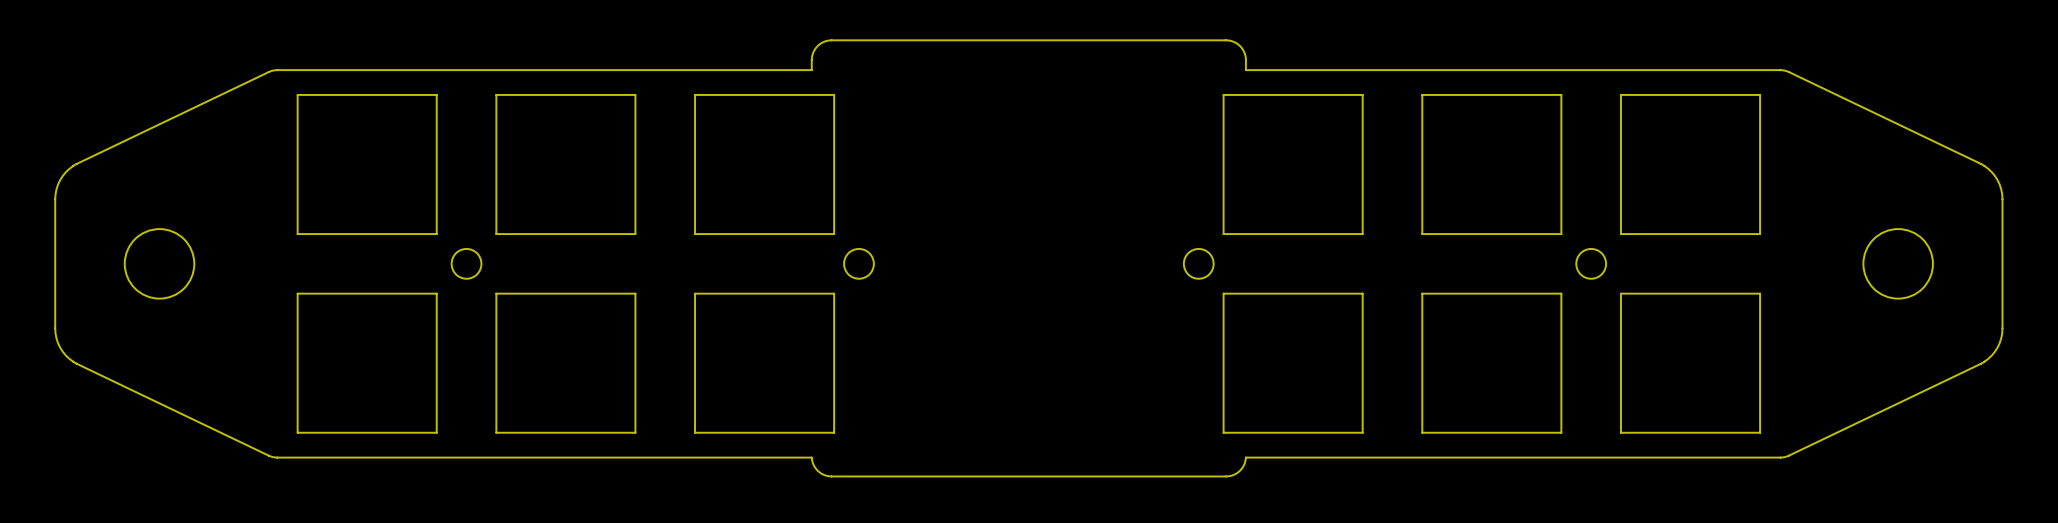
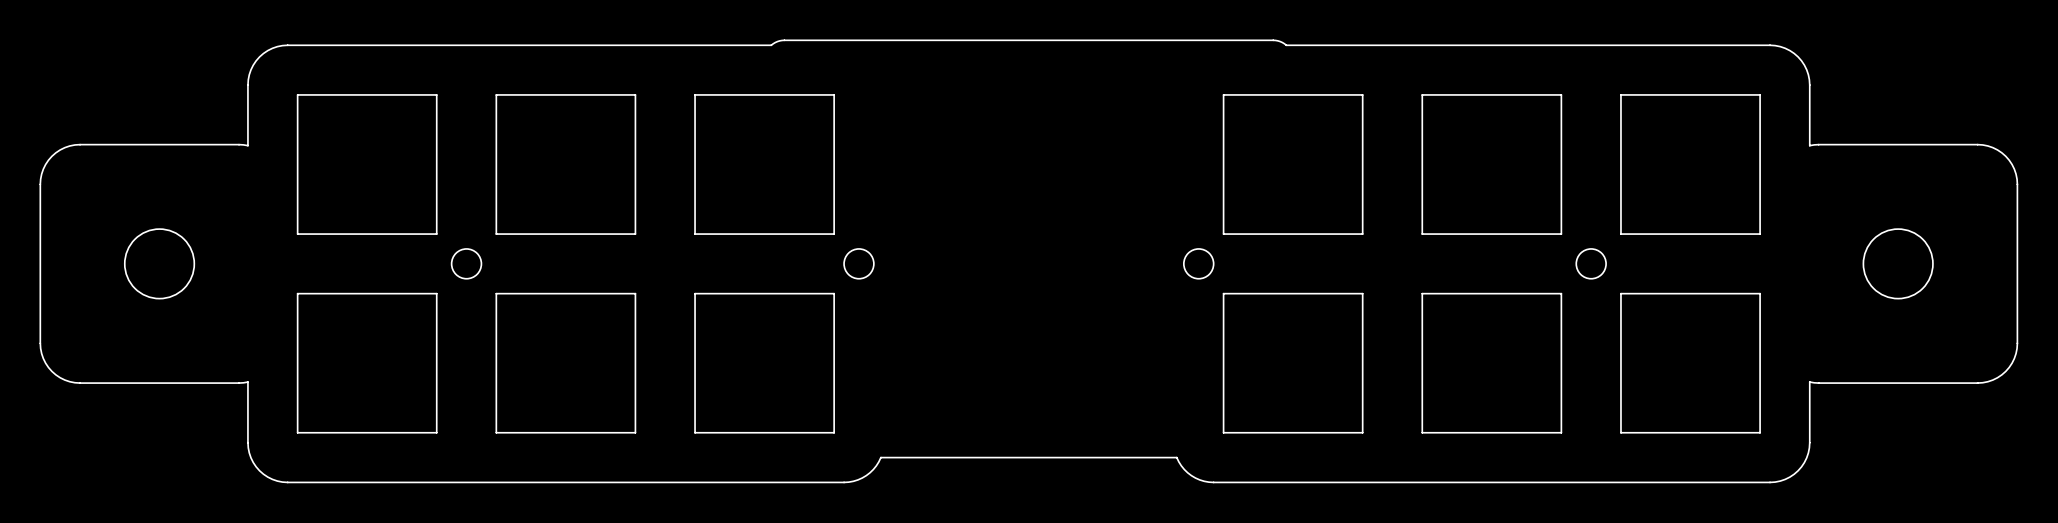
board edge: (831, 40) (821, 43) (814, 49) (811, 57) (811, 70) (270, 71) (76, 164) (62, 176) (56, 189) (55, 199) (55, 328) (57, 342) (65, 355) (76, 363) (275, 457) (811, 457) (817, 470) (831, 476) (1226, 476) (1239, 470) (1245, 457) (1784, 457) (1981, 363) (1992, 355) (1999, 342) (2002, 328) (2002, 199) (1999, 184) (1995, 176) (1981, 164) (1786, 71) (1245, 70) (1245, 57) (1242, 49) (1236, 43) (1226, 40) -> (831, 40) (782, 40) (771, 45) (287, 45) (272, 48) (259, 56) (249, 74) (247, 145) (74, 144) (60, 149) (48, 160) (41, 174) (40, 184) (40, 343) (43, 358) (55, 374) (74, 382) (247, 382) (247, 442) (250, 457) (263, 474) (282, 482) (844, 482) (857, 479) (866, 475) (876, 465) (880, 457) (1176, 457) (1184, 469) (1191, 475) (1199, 479) (1213, 482) (1770, 482) (1789, 477) (1801, 466) (1806, 457) (1809, 442) (1809, 382) (1982, 382) (2001, 374) (2014, 358) (2017, 343) (2017, 184) (2016, 174) (2009, 160) (1997, 149) (1982, 144) (1809, 145) (1808, 74) (1801, 60) (1785, 48) (1770, 45) (1286, 45) (1275, 40) (1226, 40)

